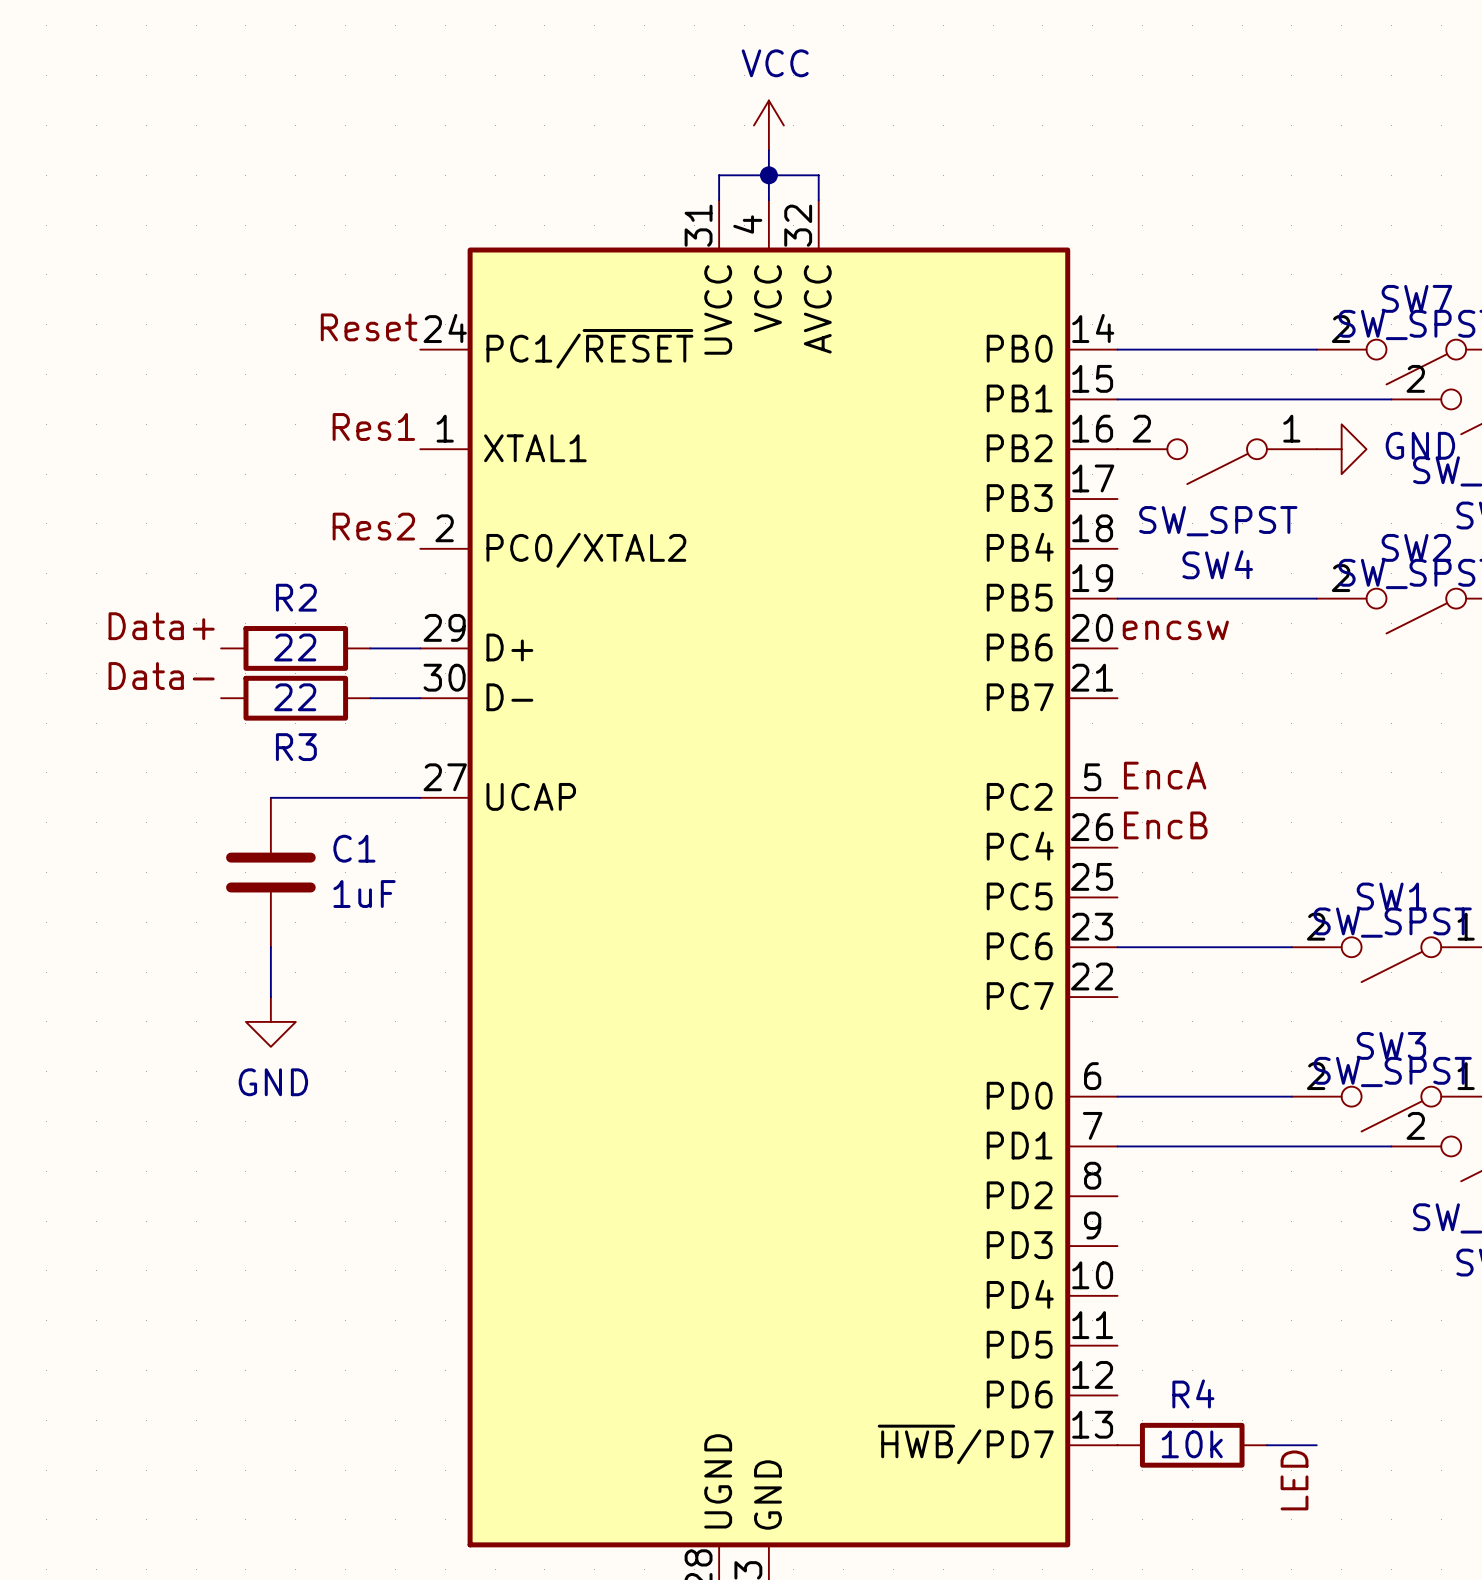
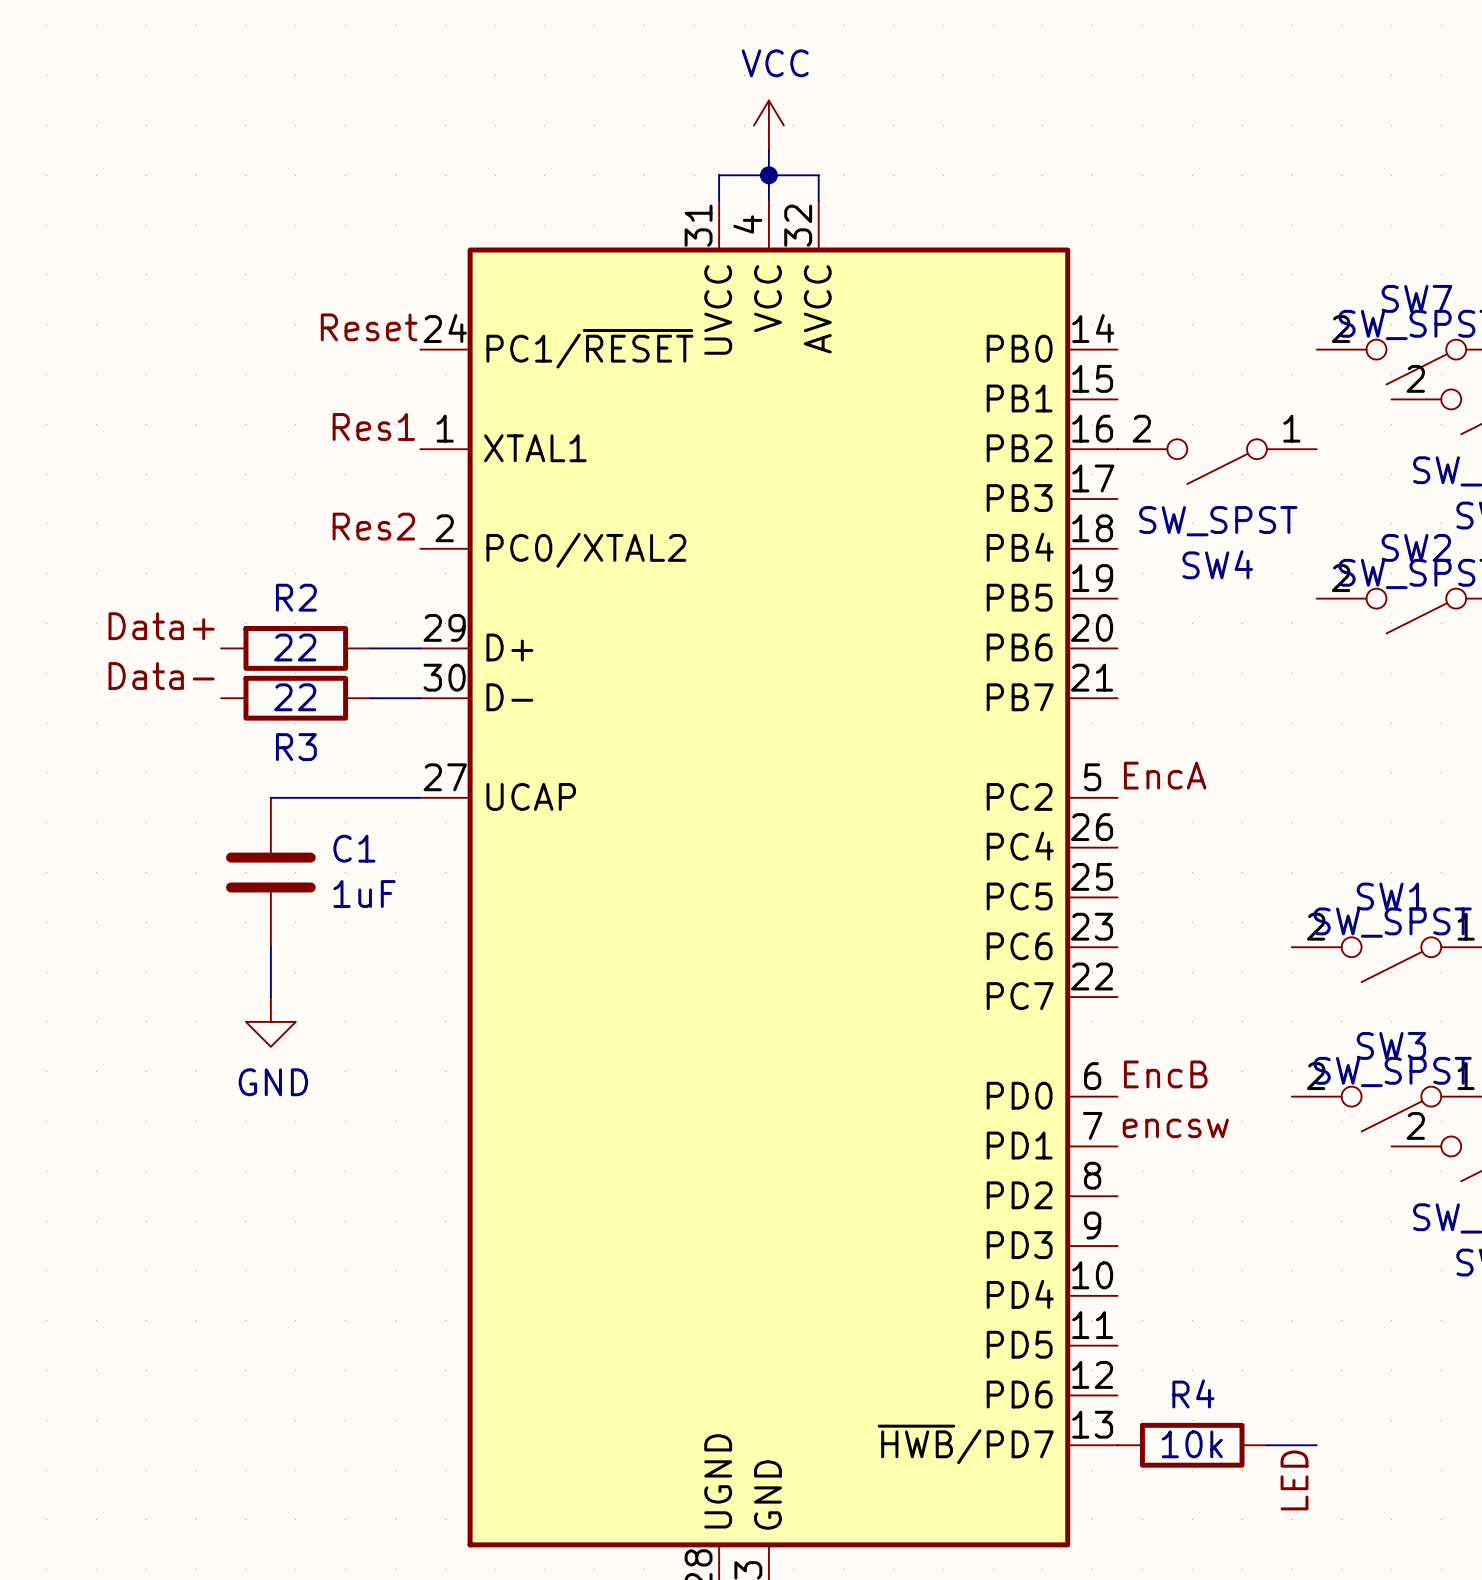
wire: (1117, 349) (1316, 349) -> none
wire: (1117, 399) (1391, 399) -> none
power symbol: GND (1341, 449) -> none
wire: (1117, 598) (1316, 598) -> none
label: encsw (1175, 630) -> none
label position: EncB (1165, 825) -> EncB (1165, 1074)
wire: (1117, 947) (1291, 947) -> none
wire: (1117, 1096) (1291, 1096) -> none
label: none -> encsw (1175, 1128)
wire: (1117, 1146) (1391, 1146) -> none

